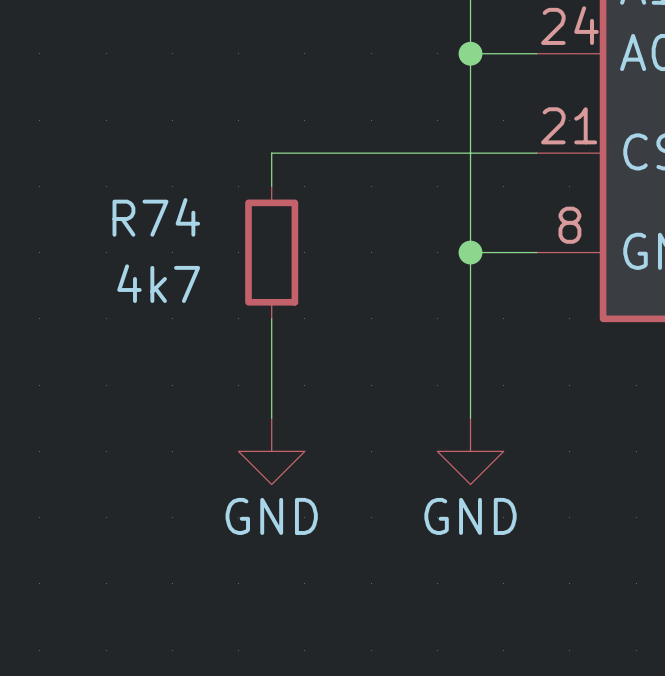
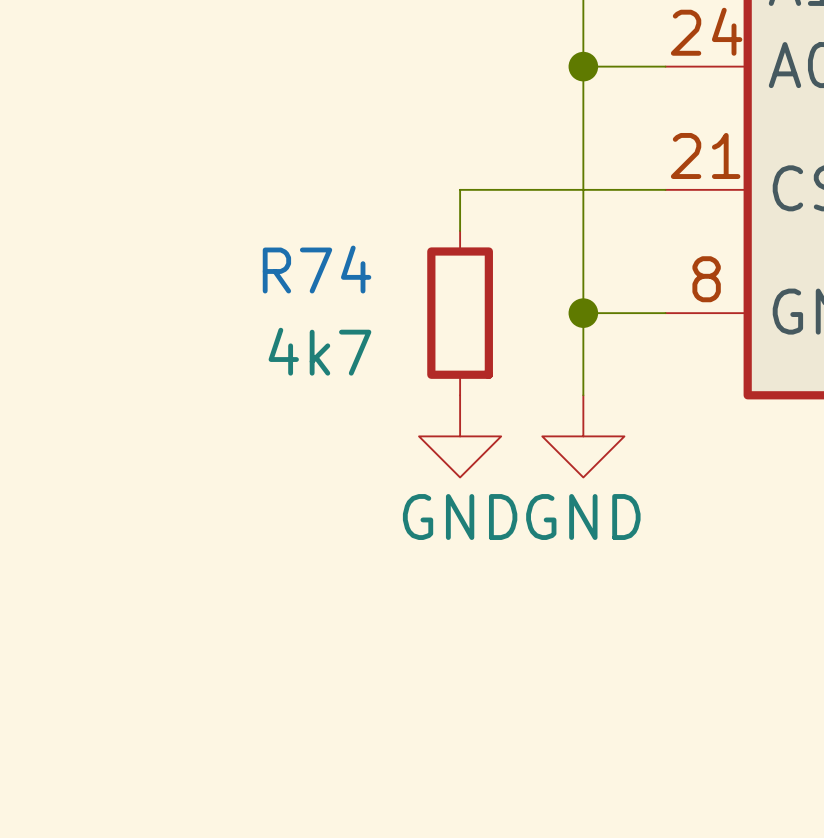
wire: (371, 153) (271, 153) (271, 186) -> (460, 189) (460, 230)
R74 position: (271, 252) -> (460, 313)
wire: (271, 318) (271, 418) -> none
wire: (470, 318) (470, 418) -> none
power symbol: none -> GND (460, 436)
power symbol: none -> GND (583, 436)
power symbol: GND (271, 451) -> none
power symbol: GND (470, 451) -> none

